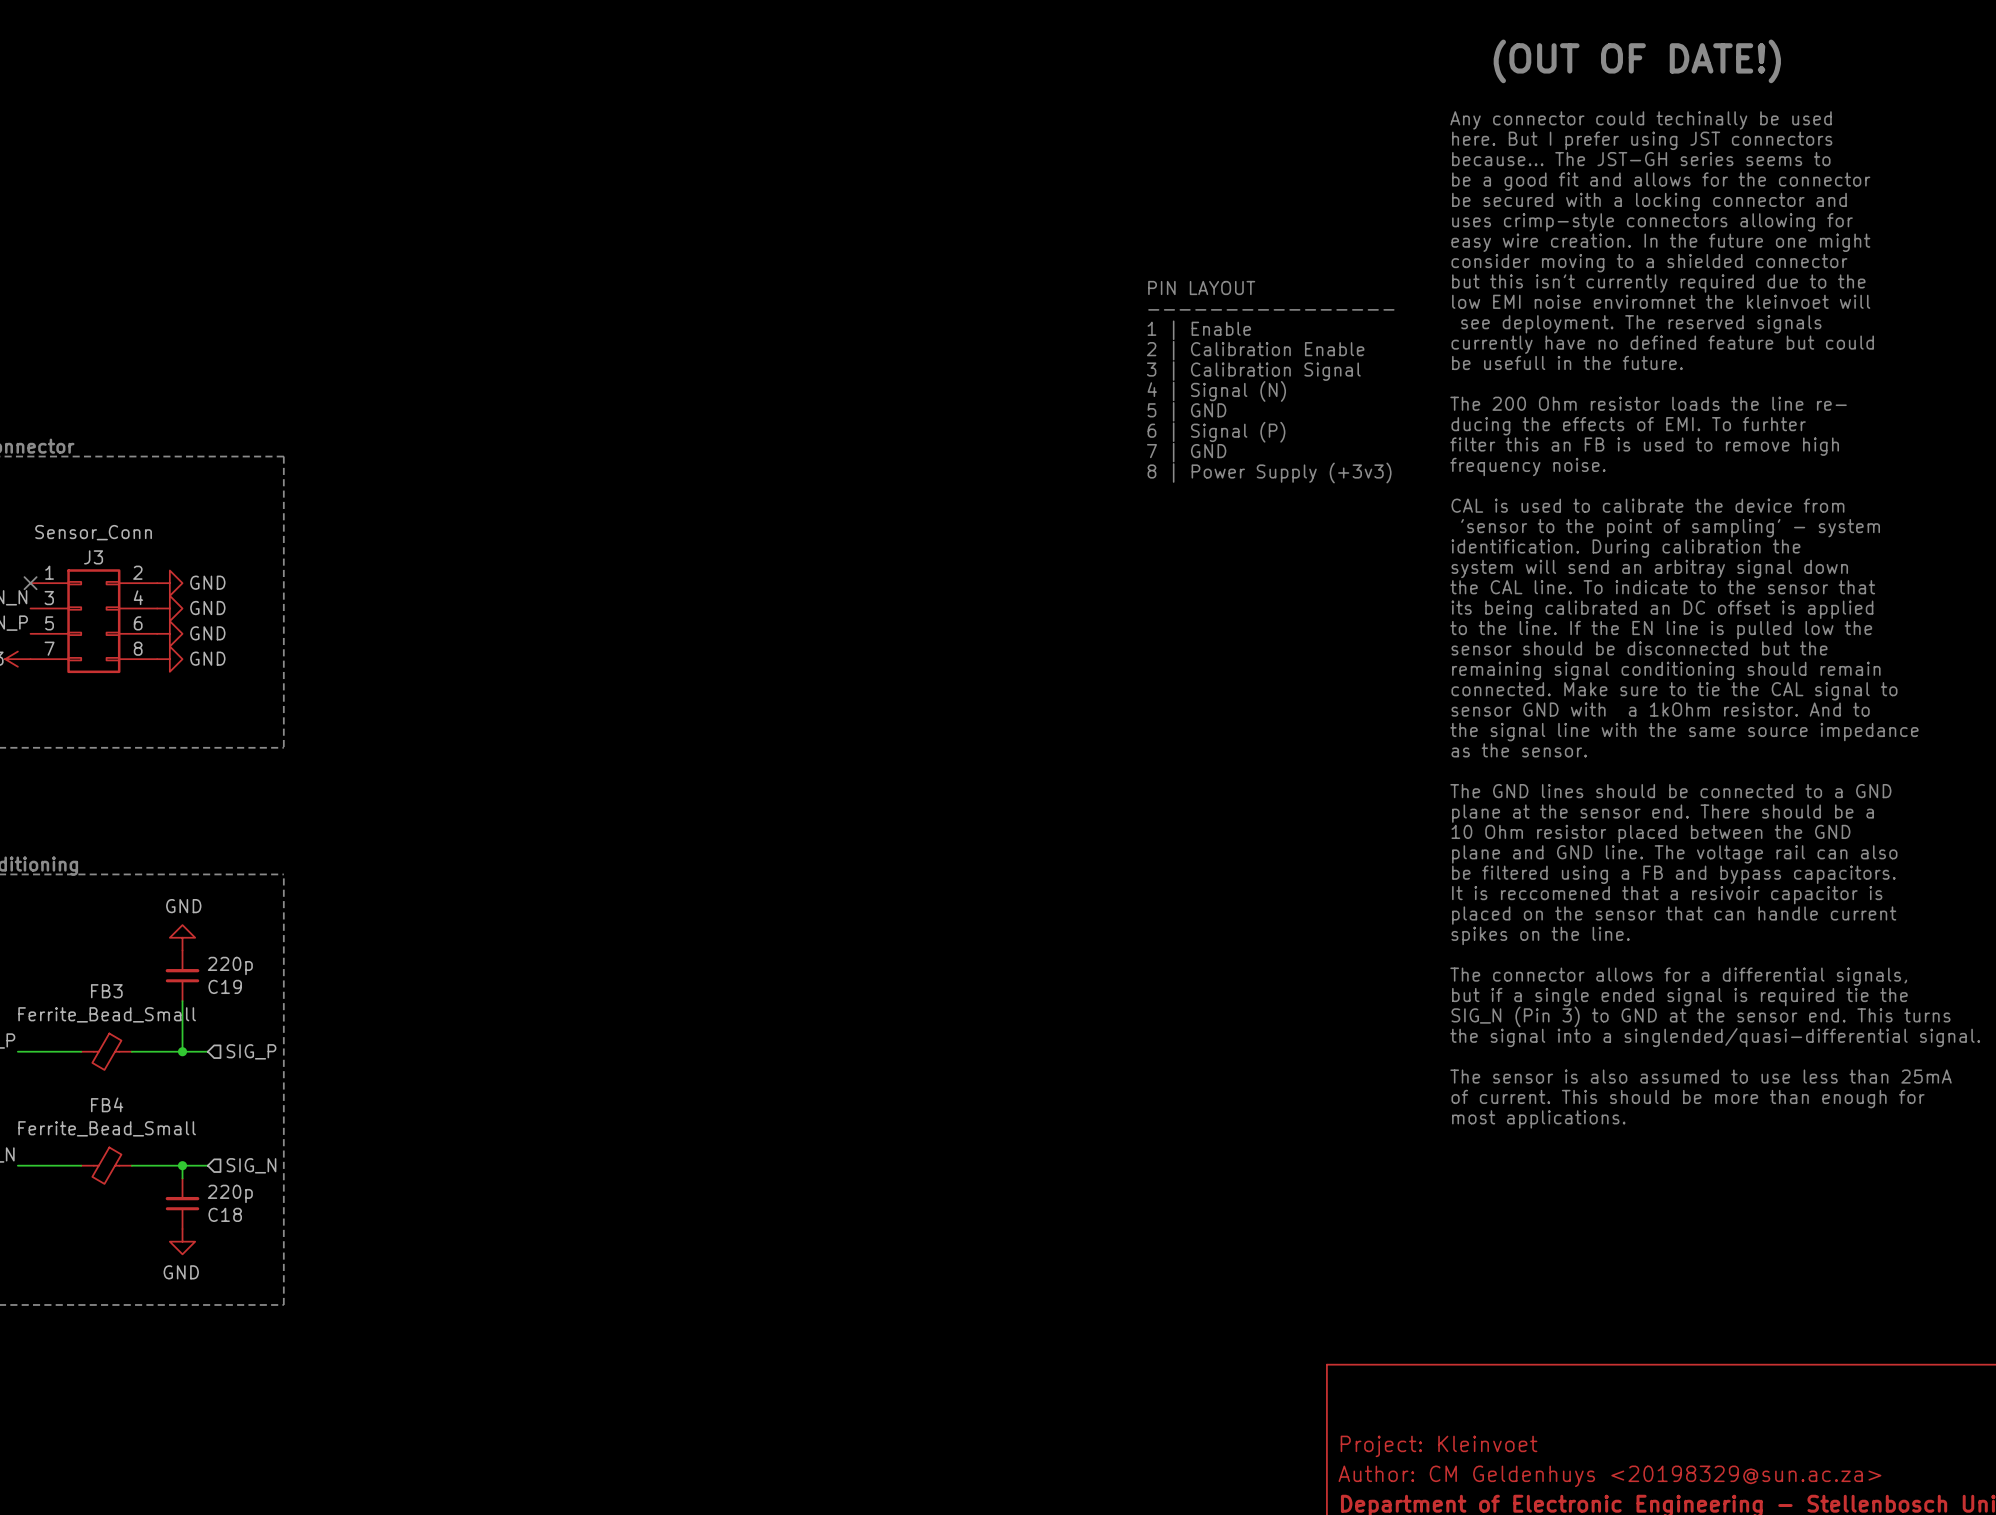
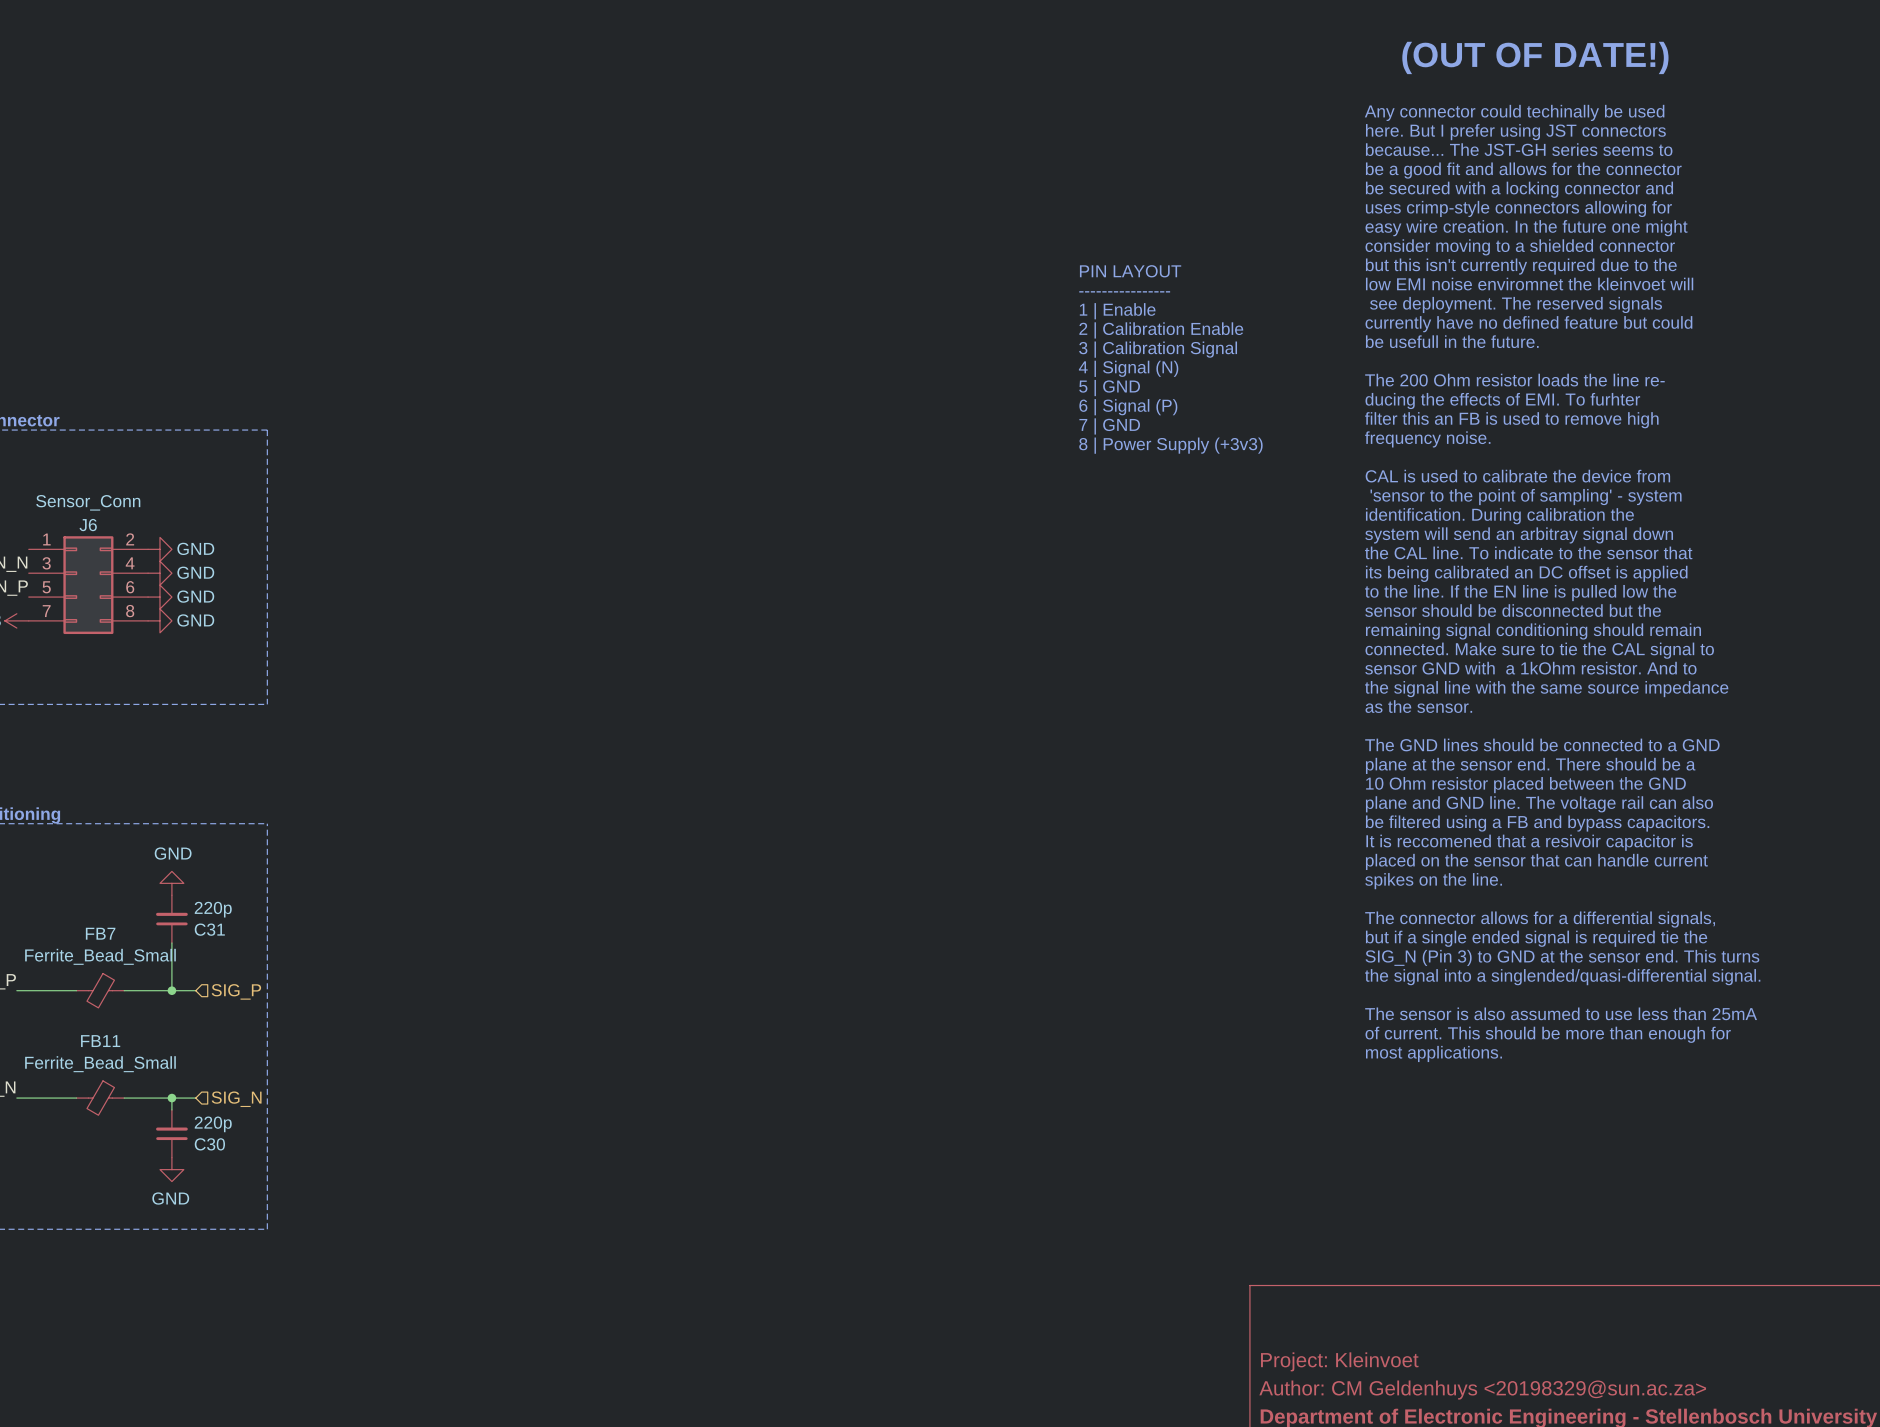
J3 name: J3 (93, 557) -> J6 (88, 525)
no-connect mark: (30, 583) -> none
C19 name: C19 (225, 986) -> C31 (209, 929)
FB3 name: FB3 (106, 991) -> FB7 (100, 933)
FB4 name: FB4 (107, 1104) -> FB11 (100, 1041)
C18 name: C18 (225, 1214) -> C30 (209, 1144)

